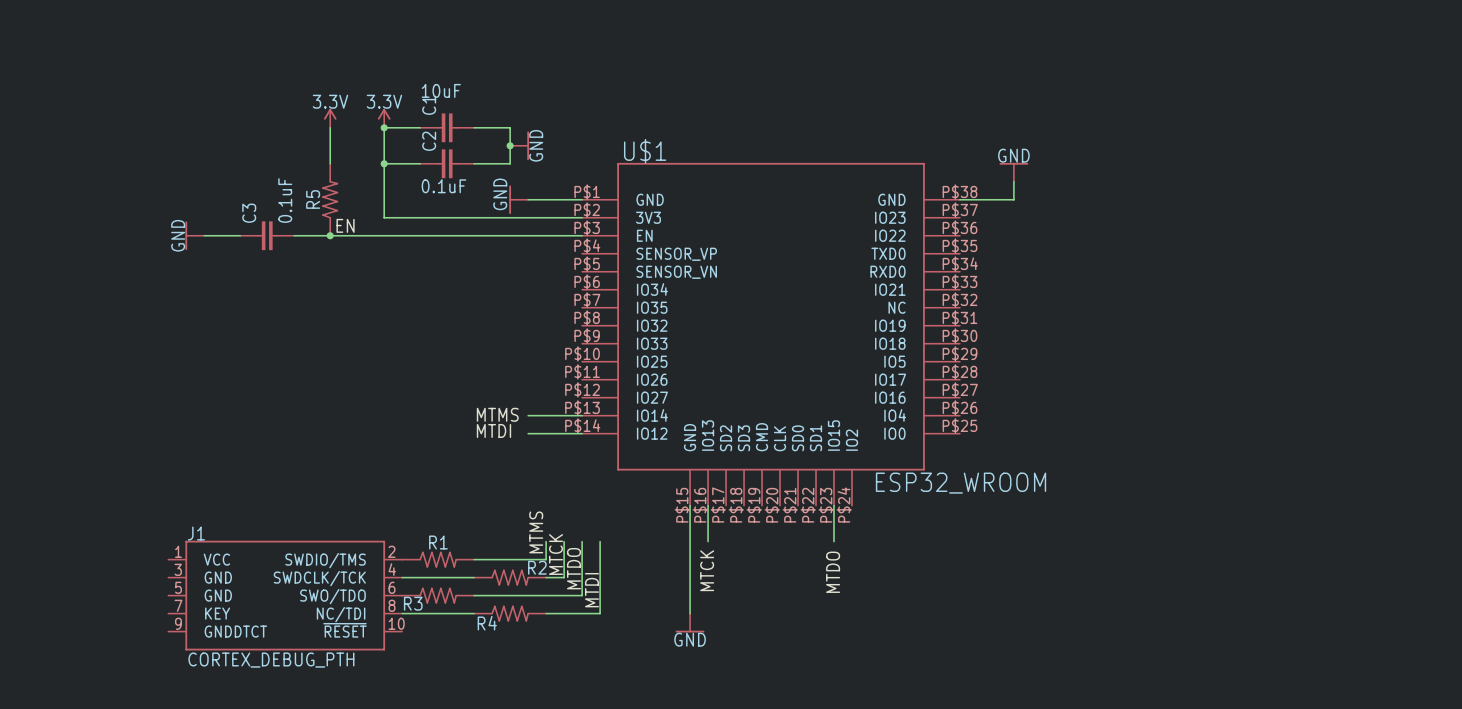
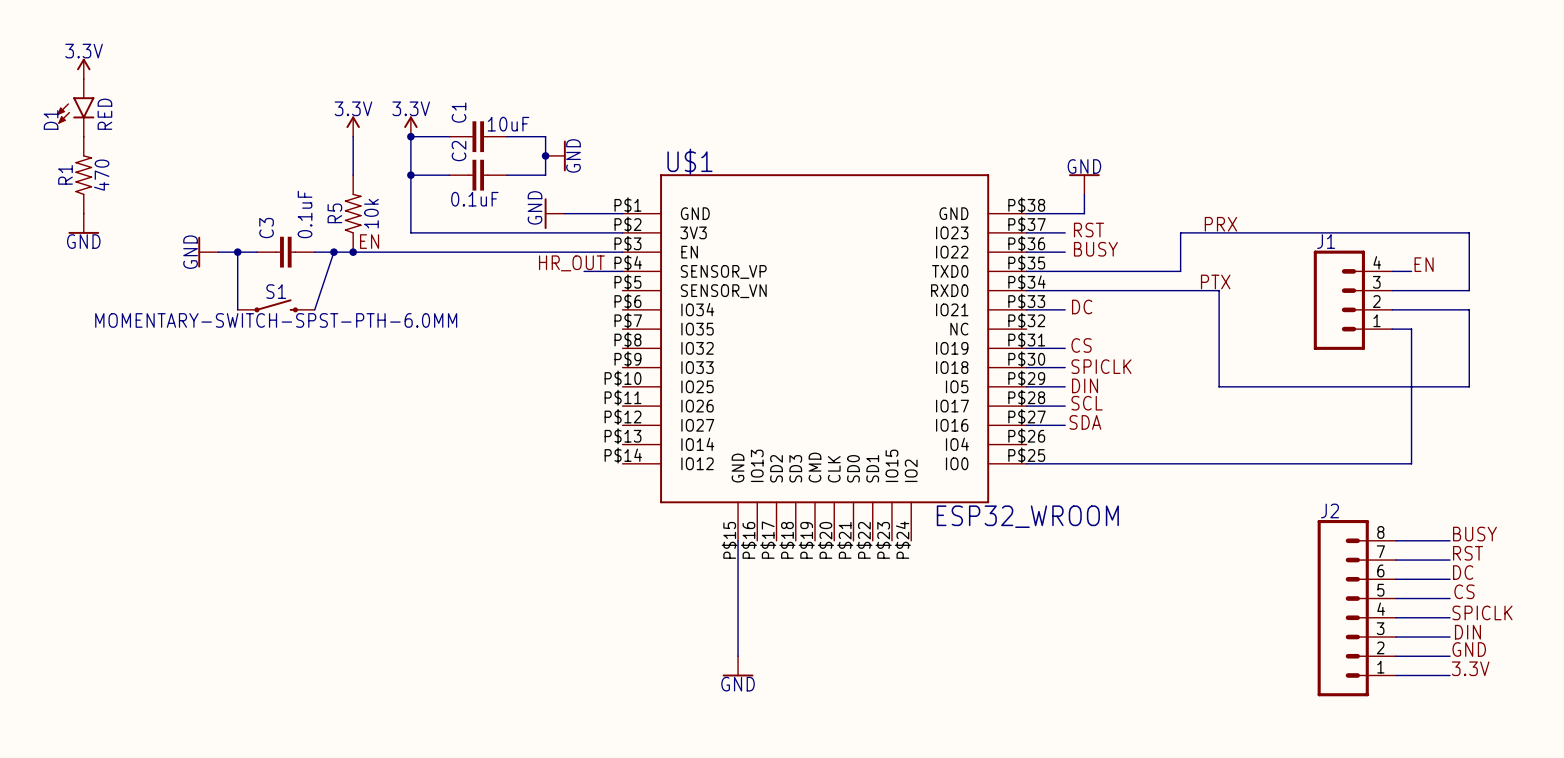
power symbol: none -> 3.3V (83, 68)
C1 value position: 10uF (441, 90) -> 10uF (508, 124)
D1: none -> RED (75, 107)
R1 value: none -> 470 (101, 175)
R5 value: none -> 10k (371, 213)
power symbol: none -> GND (83, 223)
label: none -> PRX (1220, 224)
label: none -> RST (1088, 230)
wire: none -> (1026, 232) (1065, 232)
label: none -> BUSY (1095, 249)
wire: none -> (237, 252) (237, 309)
junction: none -> (237, 252)
wire: none -> (333, 252) (314, 309)
junction: none -> (333, 252)
wire: none -> (1026, 252) (1065, 252)
label: none -> HR_OUT (571, 263)
label: none -> EN (1424, 264)
wire: none -> (584, 271) (622, 271)
wire: none -> (1026, 271) (1180, 271) (1180, 232) (1469, 232) (1469, 290) (1392, 290)
wire: none -> (1392, 271) (1411, 271)
label: none -> PTX (1215, 281)
wire: none -> (1026, 290) (1219, 290) (1219, 386) (1469, 386) (1469, 309) (1392, 309)
S1: none -> MOMENTARY-SWITCH-SPST-PTH-6.0MM (276, 305)
label: none -> DC (1082, 306)
wire: none -> (1026, 309) (1065, 309)
wire: none -> (1392, 329) (1411, 329) (1411, 463) (1026, 463)
label: none -> CS (1081, 345)
wire: none -> (1026, 348) (1065, 348)
label: none -> SPICLK (1101, 366)
wire: none -> (1026, 367) (1065, 367)
label: none -> DIN (1085, 385)
wire: none -> (1026, 386) (1065, 386)
label: none -> SCL (1087, 403)
wire: none -> (1026, 406) (1065, 406)
label: none -> SDA (1085, 422)
wire: none -> (1026, 425) (1065, 425)
label: MTMS (497, 414) -> none
wire: (528, 415) (582, 415) -> none
label: MTDI (493, 430) -> none
wire: (528, 433) (582, 433) -> none
label: none -> BUSY (1474, 534)
wire: (708, 505) (708, 541) -> none
wire: (833, 505) (833, 541) -> none
wire: none -> (1396, 540) (1450, 540)
label: none -> RST (1468, 553)
wire: none -> (1396, 560) (1450, 560)
label: MTMS (536, 532) -> none
J1 name position: J1 (196, 533) -> J1 (1326, 241)
label: none -> DC (1463, 572)
J1 symbol: [168, 540, 403, 651] -> [1313, 250, 1393, 350]
wire: (546, 541) (546, 559) (474, 559) -> none
wire: (564, 541) (564, 577) (546, 577) -> none
wire: (582, 541) (582, 595) (474, 595) -> none
wire: (600, 541) (600, 613) (546, 613) -> none
wire: none -> (1396, 579) (1450, 579)
label: none -> CS (1464, 591)
label: MTCK (556, 554) -> none
R1 rotation: 0° (438, 559) -> 90° counterclockwise (83, 175)
R1 position: (438, 559) -> (83, 175)
wire: none -> (1396, 598) (1450, 598)
label: MTDO (574, 568) -> none
J2: none -> (1356, 608)
label: MTCK (707, 570) -> none
label: MTDO (833, 572) -> none
label: none -> SPICLK (1482, 612)
wire: (402, 577) (474, 577) -> none
R2: (510, 577) -> none
wire: none -> (1396, 617) (1450, 617)
label: MTDI (592, 590) -> none
label: none -> DIN (1467, 632)
R3: (438, 595) -> none
wire: none -> (1396, 637) (1450, 637)
label: none -> GND (1469, 649)
wire: (402, 613) (474, 613) -> none
R4: (510, 613) -> none
wire: none -> (1396, 656) (1450, 656)
label: none -> 3.3V (1470, 668)
wire: none -> (1396, 675) (1450, 675)
J1 value: CORTEX_DEBUG_PTH (271, 660) -> none

